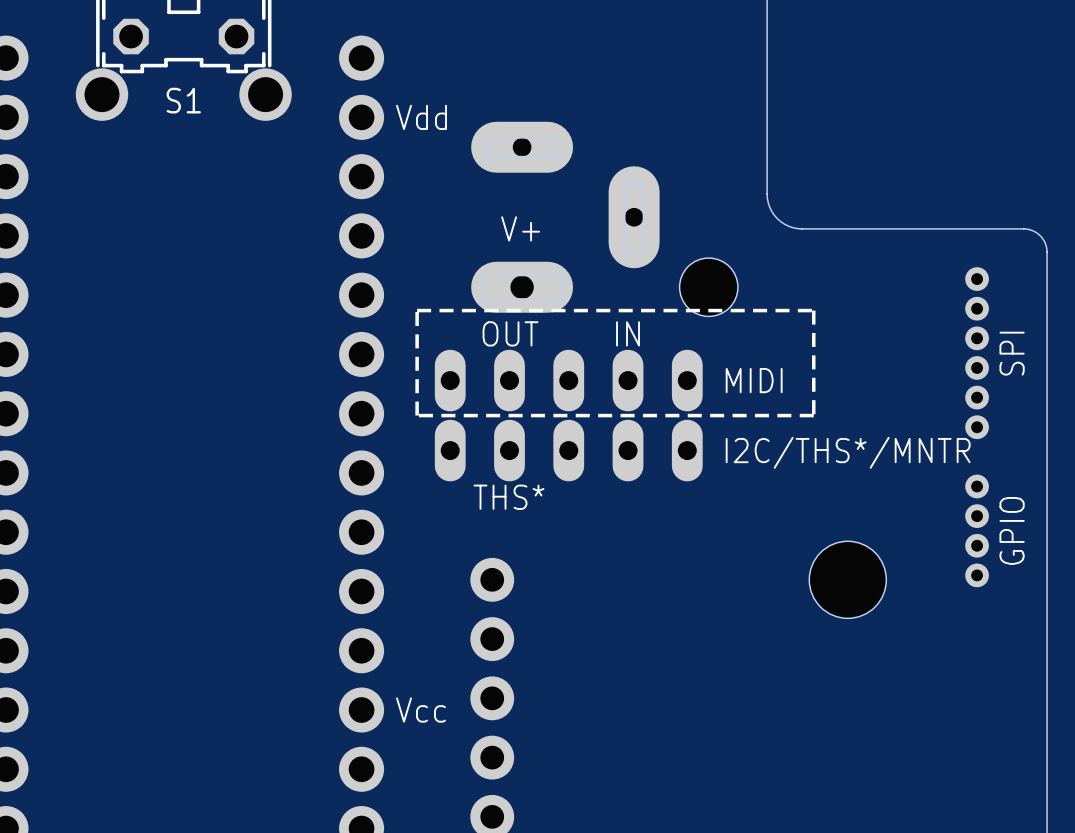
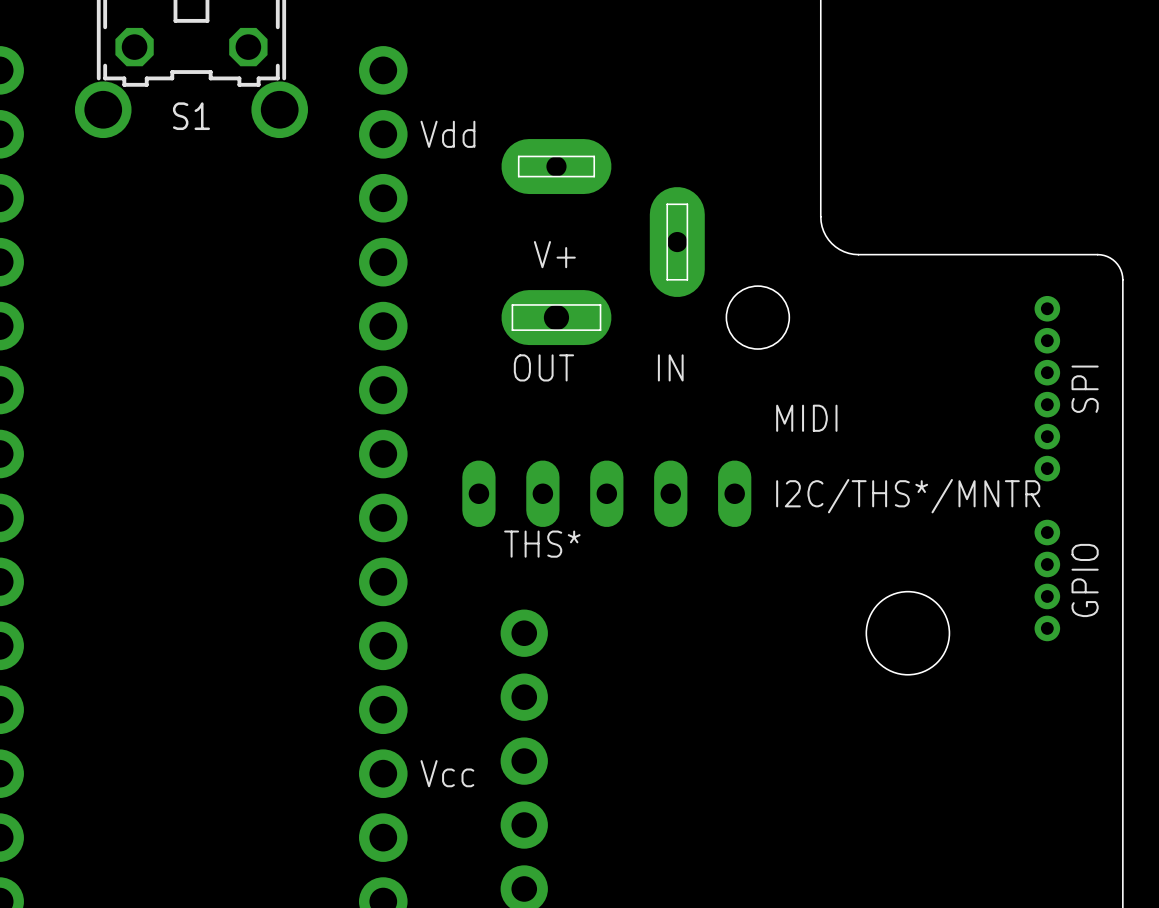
line: (813, 310) (417, 310) (417, 415) (813, 415) (813, 310) -> none
part: (568, 380) -> none

